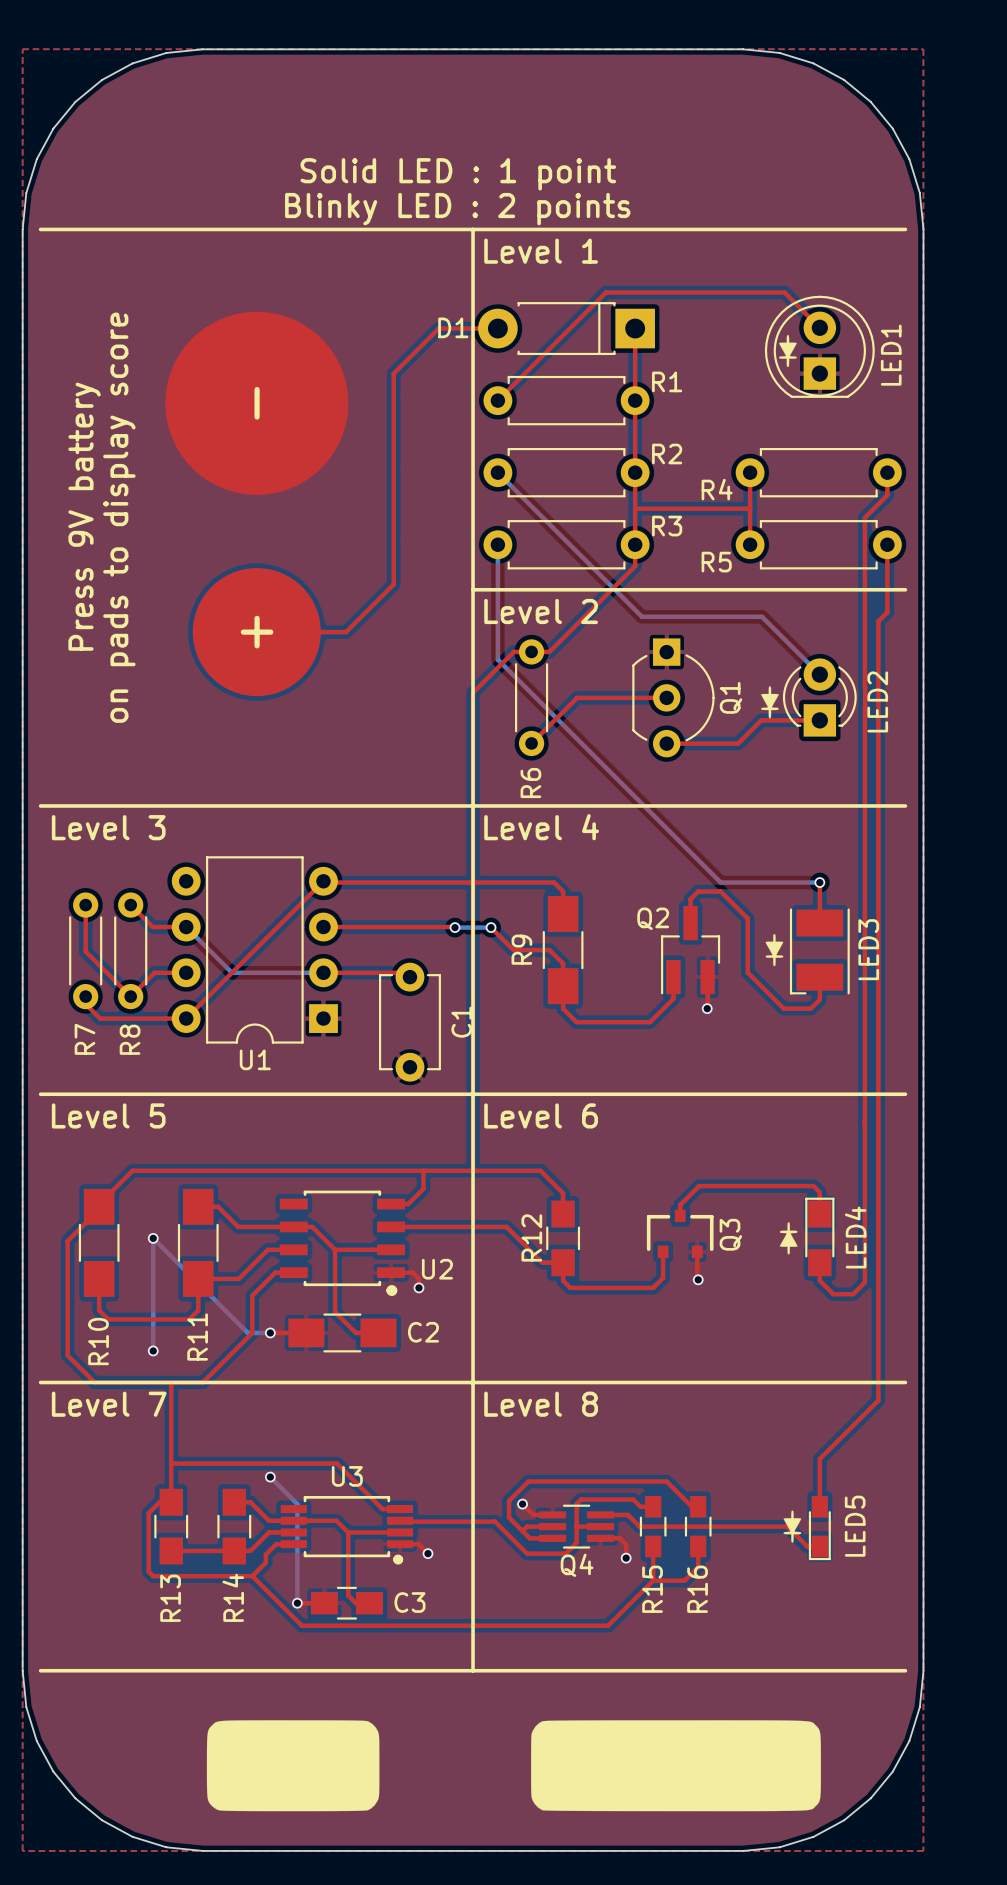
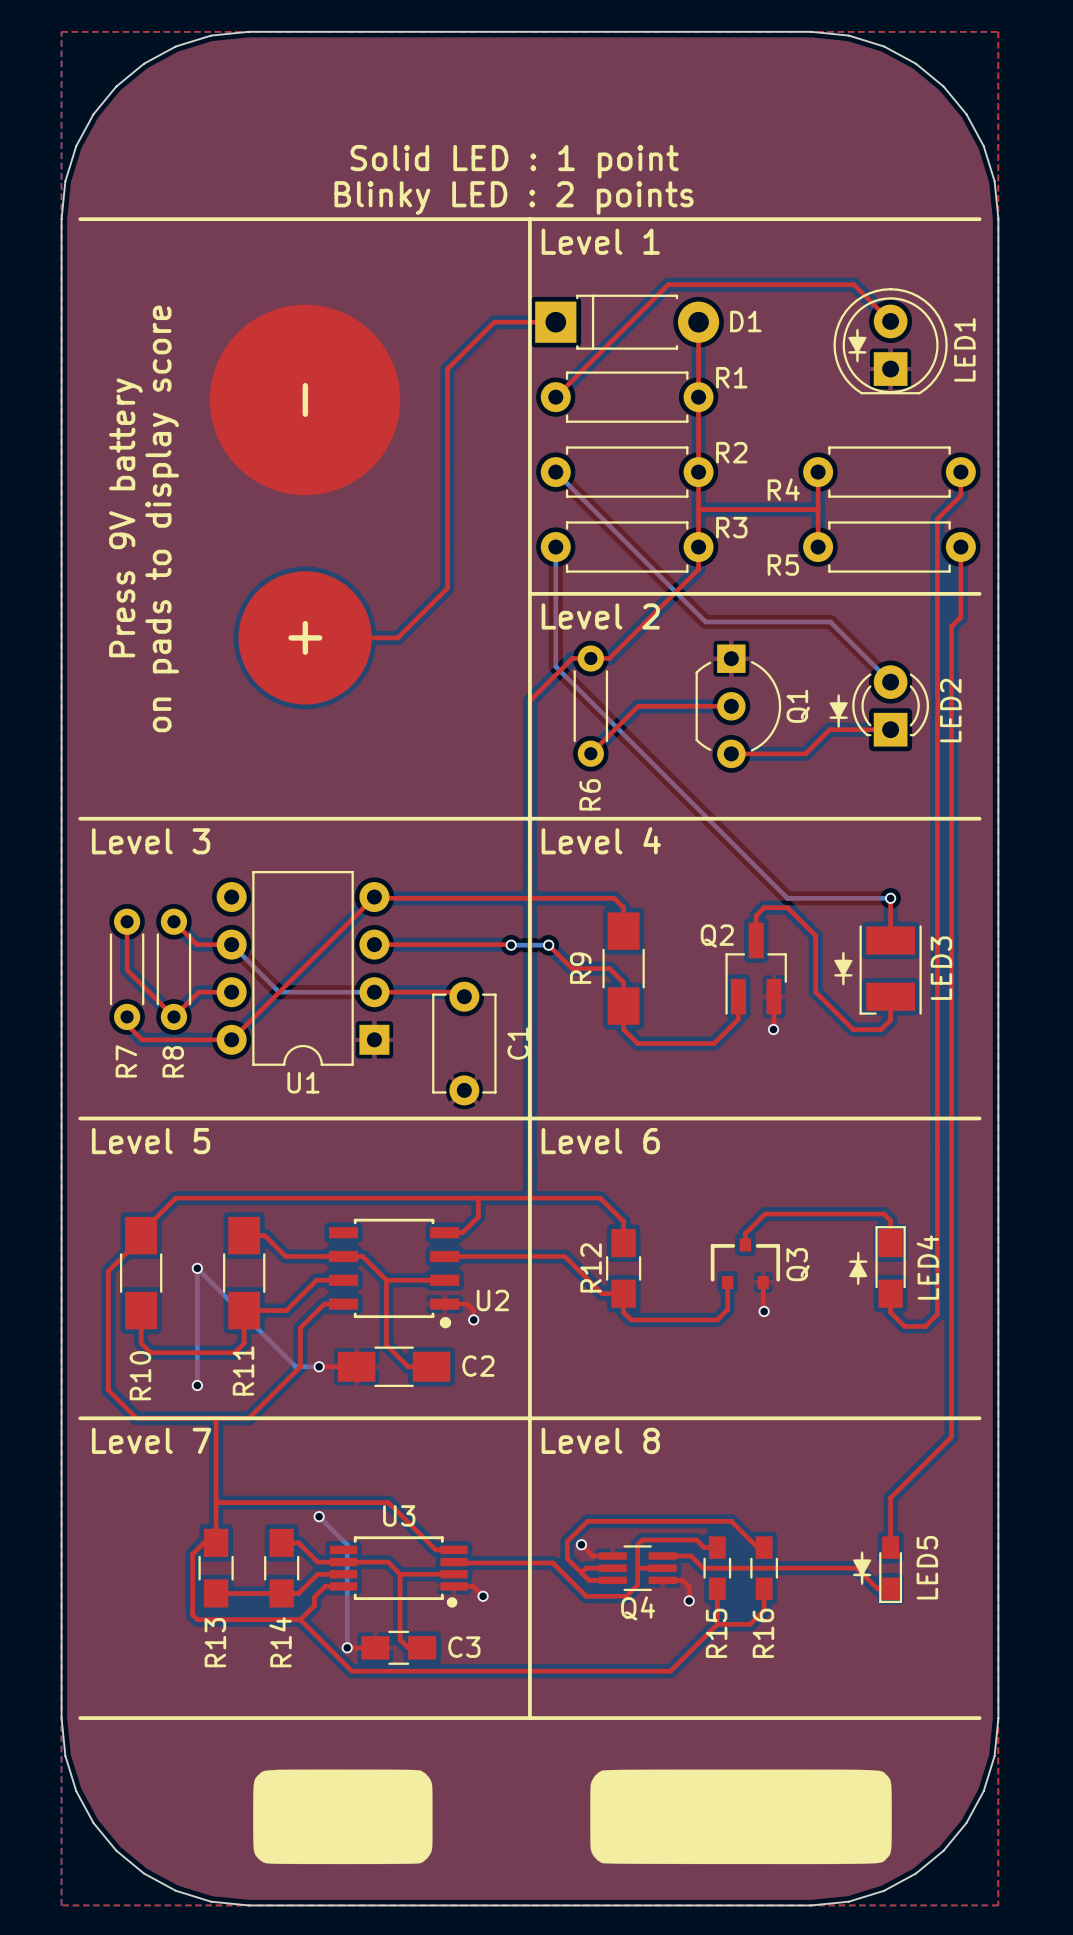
D1 rotation: 0° (566, 328) -> 180° (627, 322)

